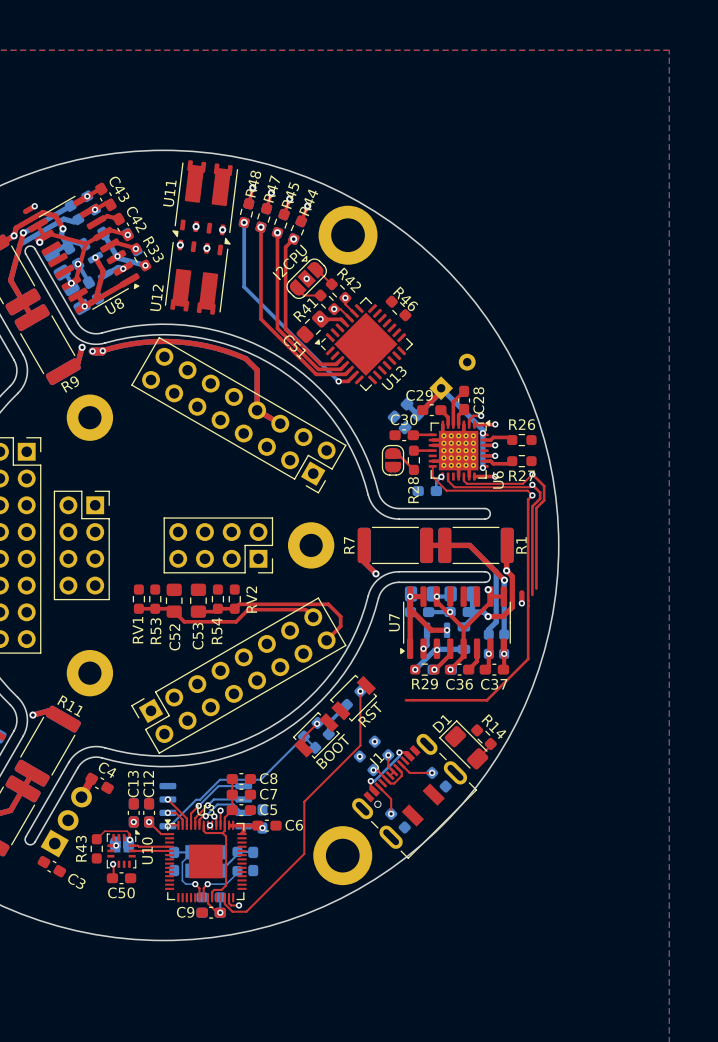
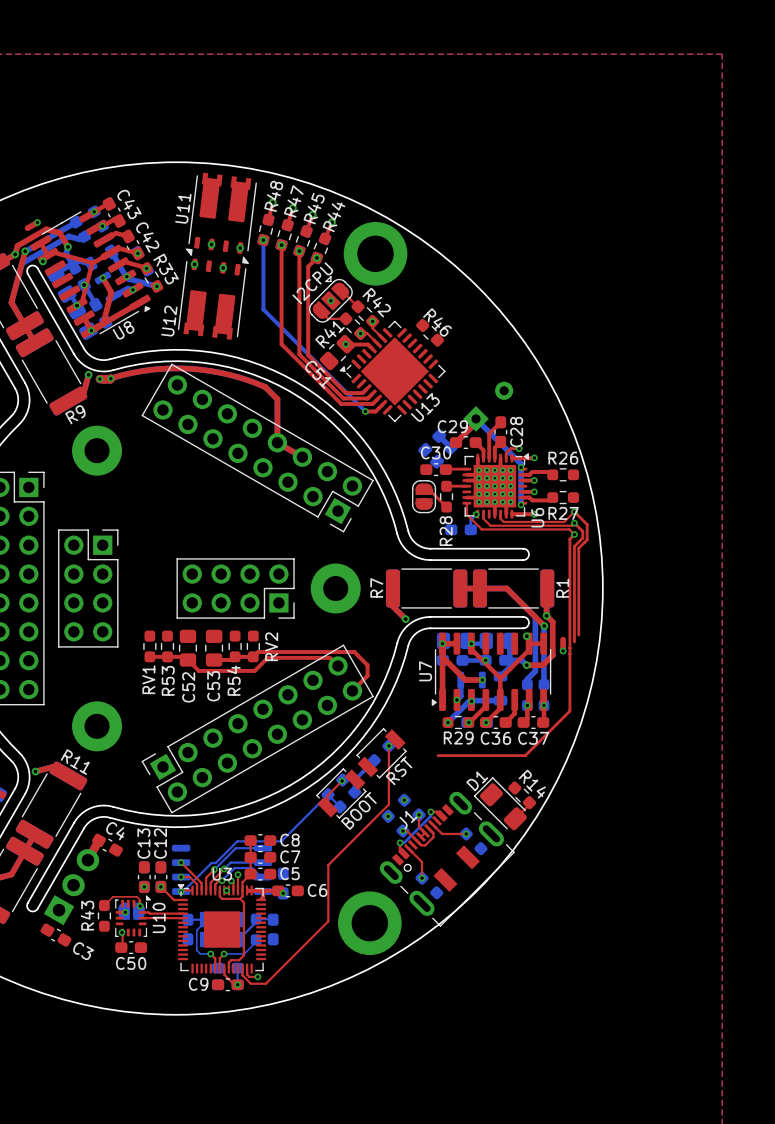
U11 footprint: [172, 160, 239, 238] -> [185, 172, 257, 256]
U12 footprint: [164, 237, 231, 315] -> [177, 256, 249, 340]

